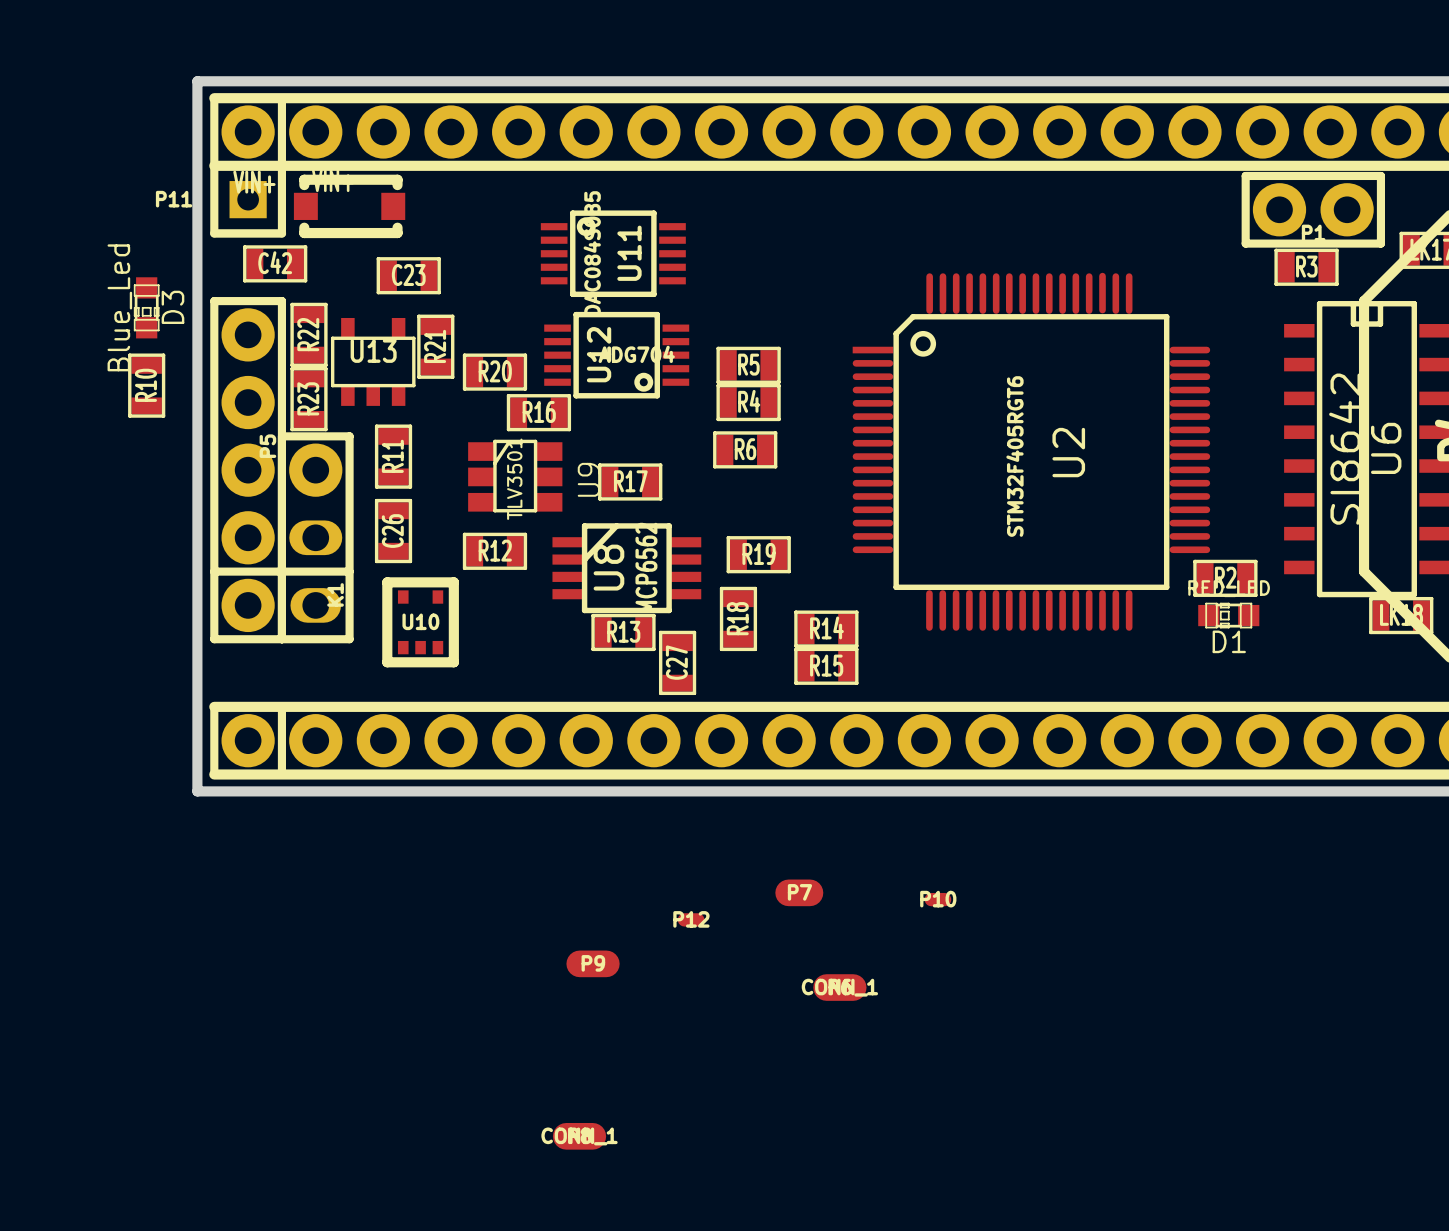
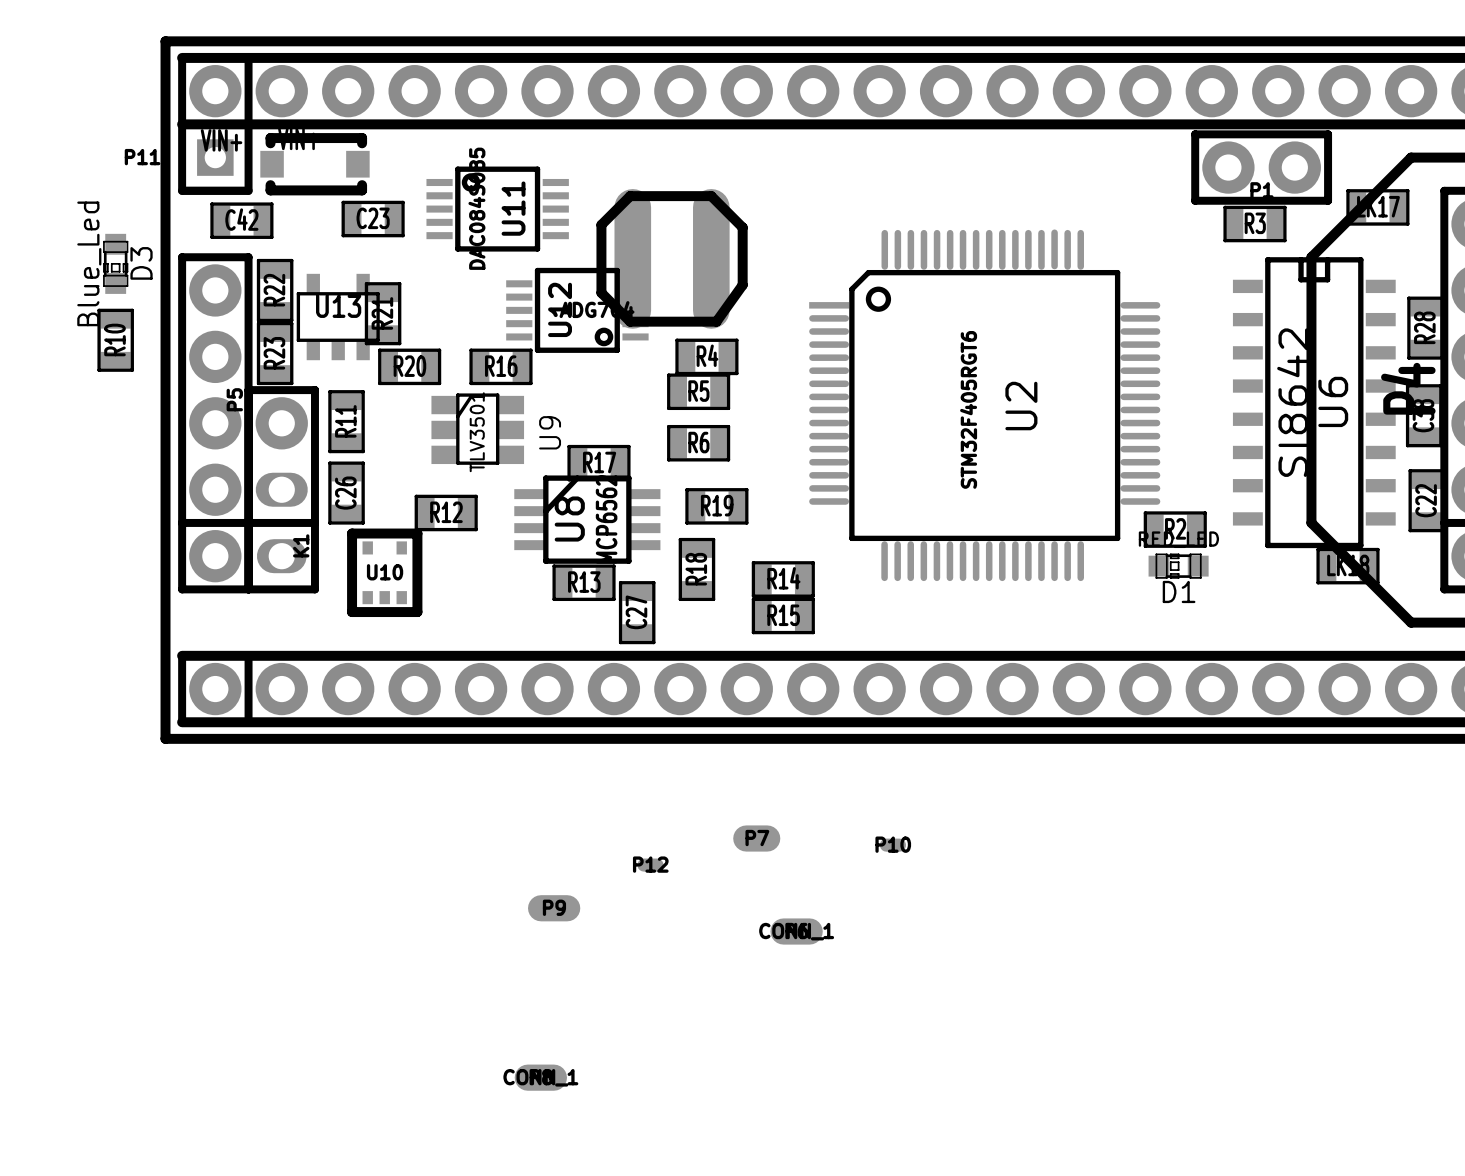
U11 position: (613, 253) -> (497, 209)
C23 position: (408, 275) -> (373, 219)
part: none -> (672, 258)
R21 position: (435, 346) -> (383, 313)
R5 position: (748, 365) -> (698, 391)
R20 position: (494, 372) -> (409, 366)
R6 position: (745, 449) -> (698, 443)
R11 position: (393, 456) -> (346, 421)
R17 position: (630, 481) -> (598, 463)
C26 position: (393, 531) -> (346, 493)
R12 position: (494, 551) -> (446, 512)

